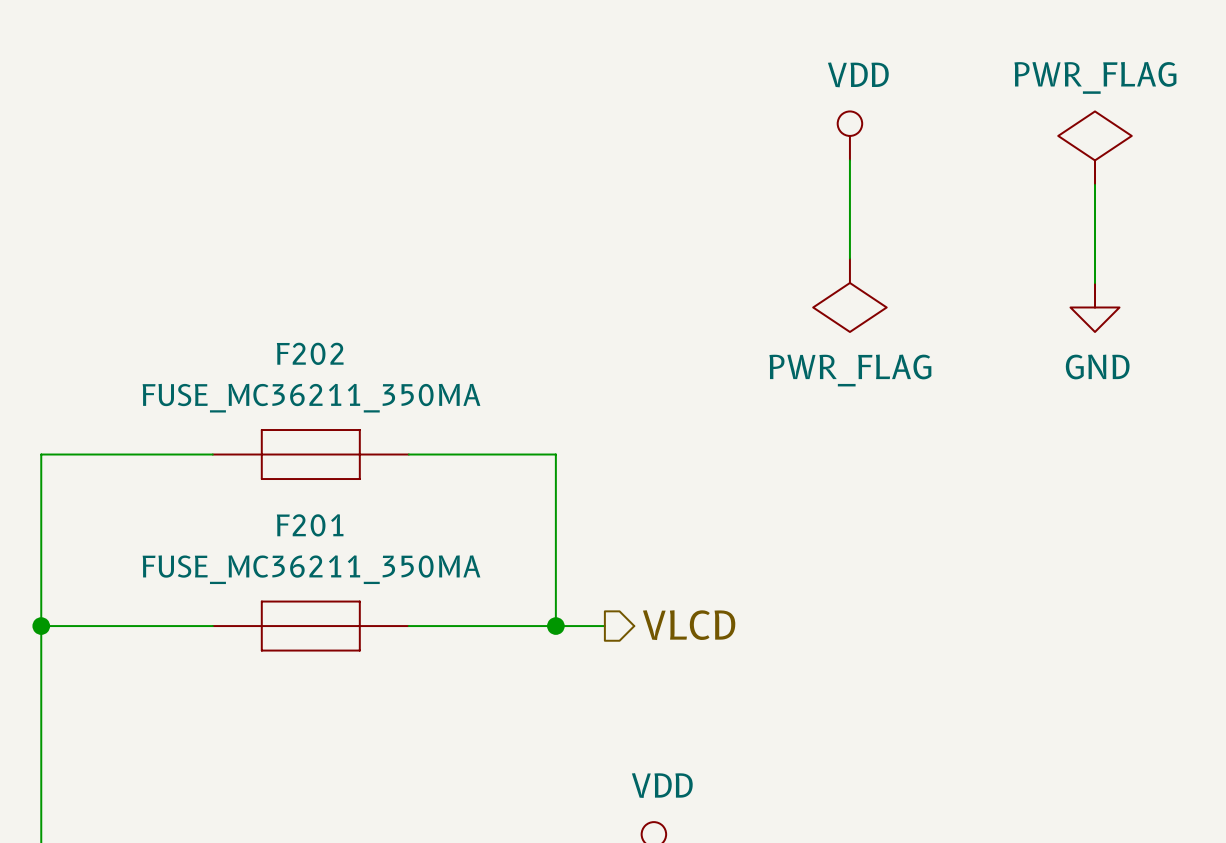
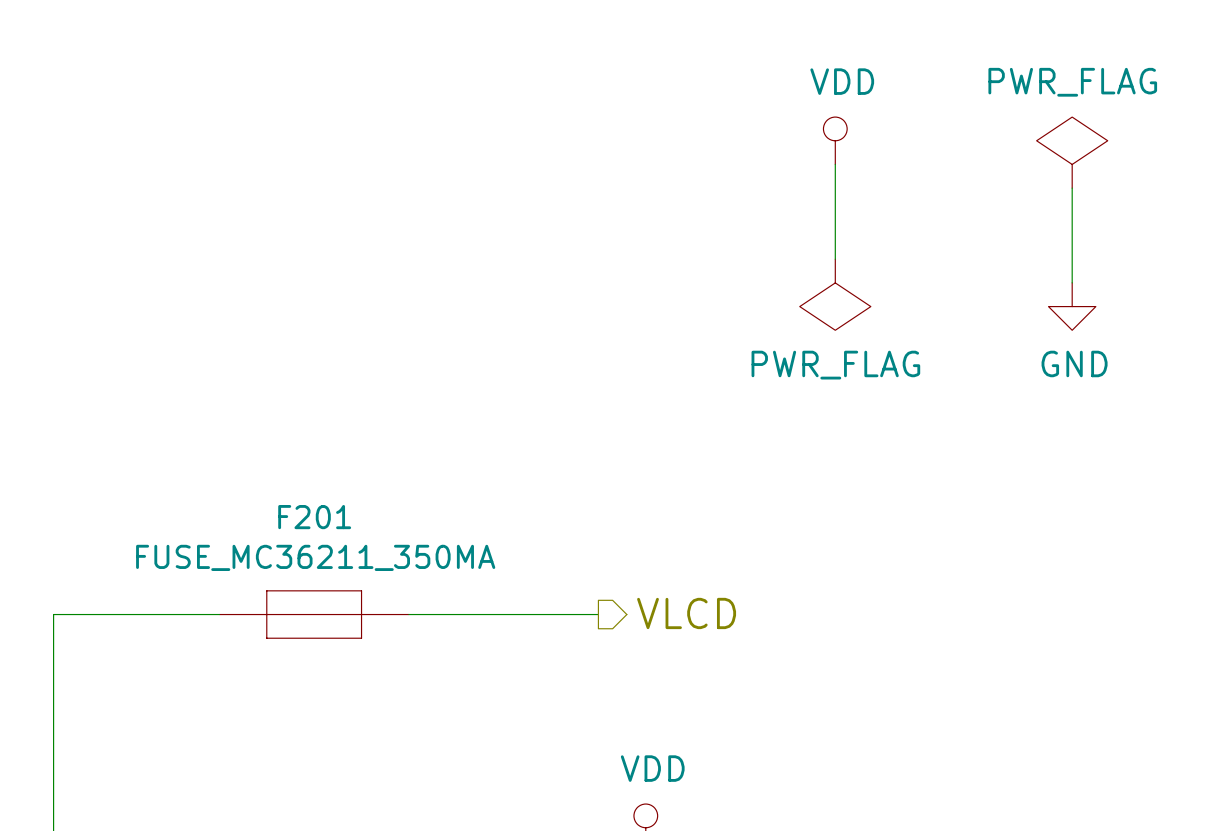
wire: (212, 454) (41, 454) (41, 626) -> none
F202: FUSE_MC36211_350MA (310, 454) -> none
wire: (408, 454) (555, 454) (555, 626) -> none
junction: (41, 626) -> none
junction: (555, 626) -> none

